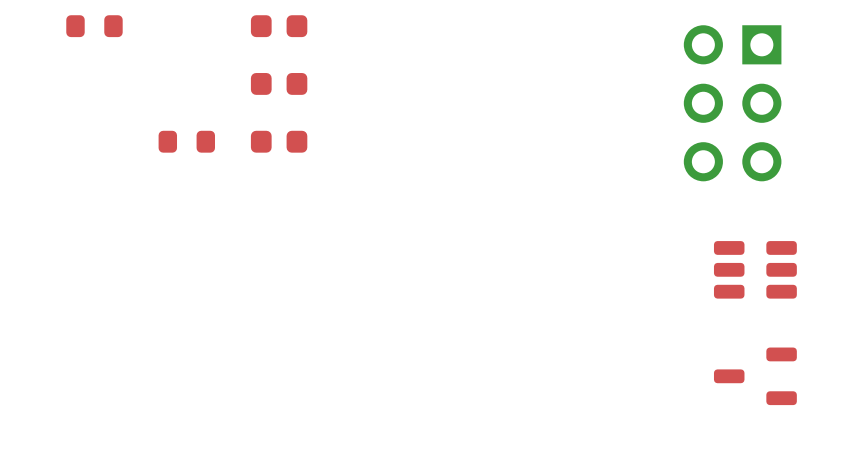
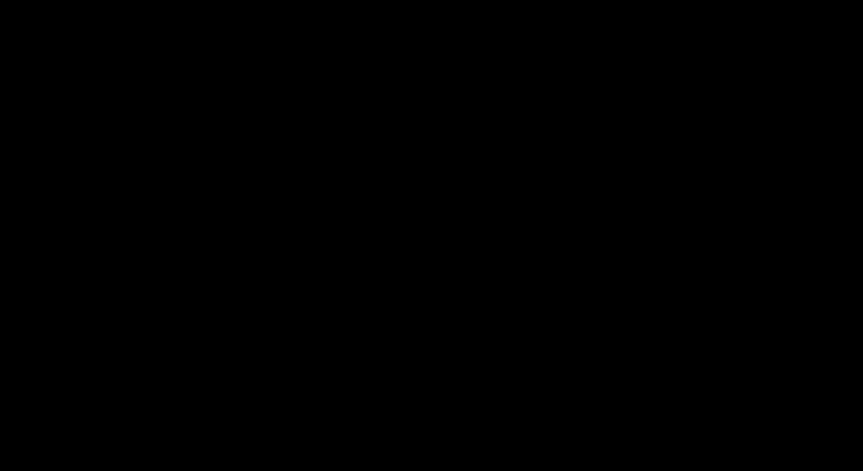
part: (94, 26) -> none
part: (279, 26) -> none
part: (279, 83) -> none
part: (732, 103) -> none
part: (186, 141) -> none
part: (279, 141) -> none
part: (755, 269) -> none
part: (755, 376) -> none

